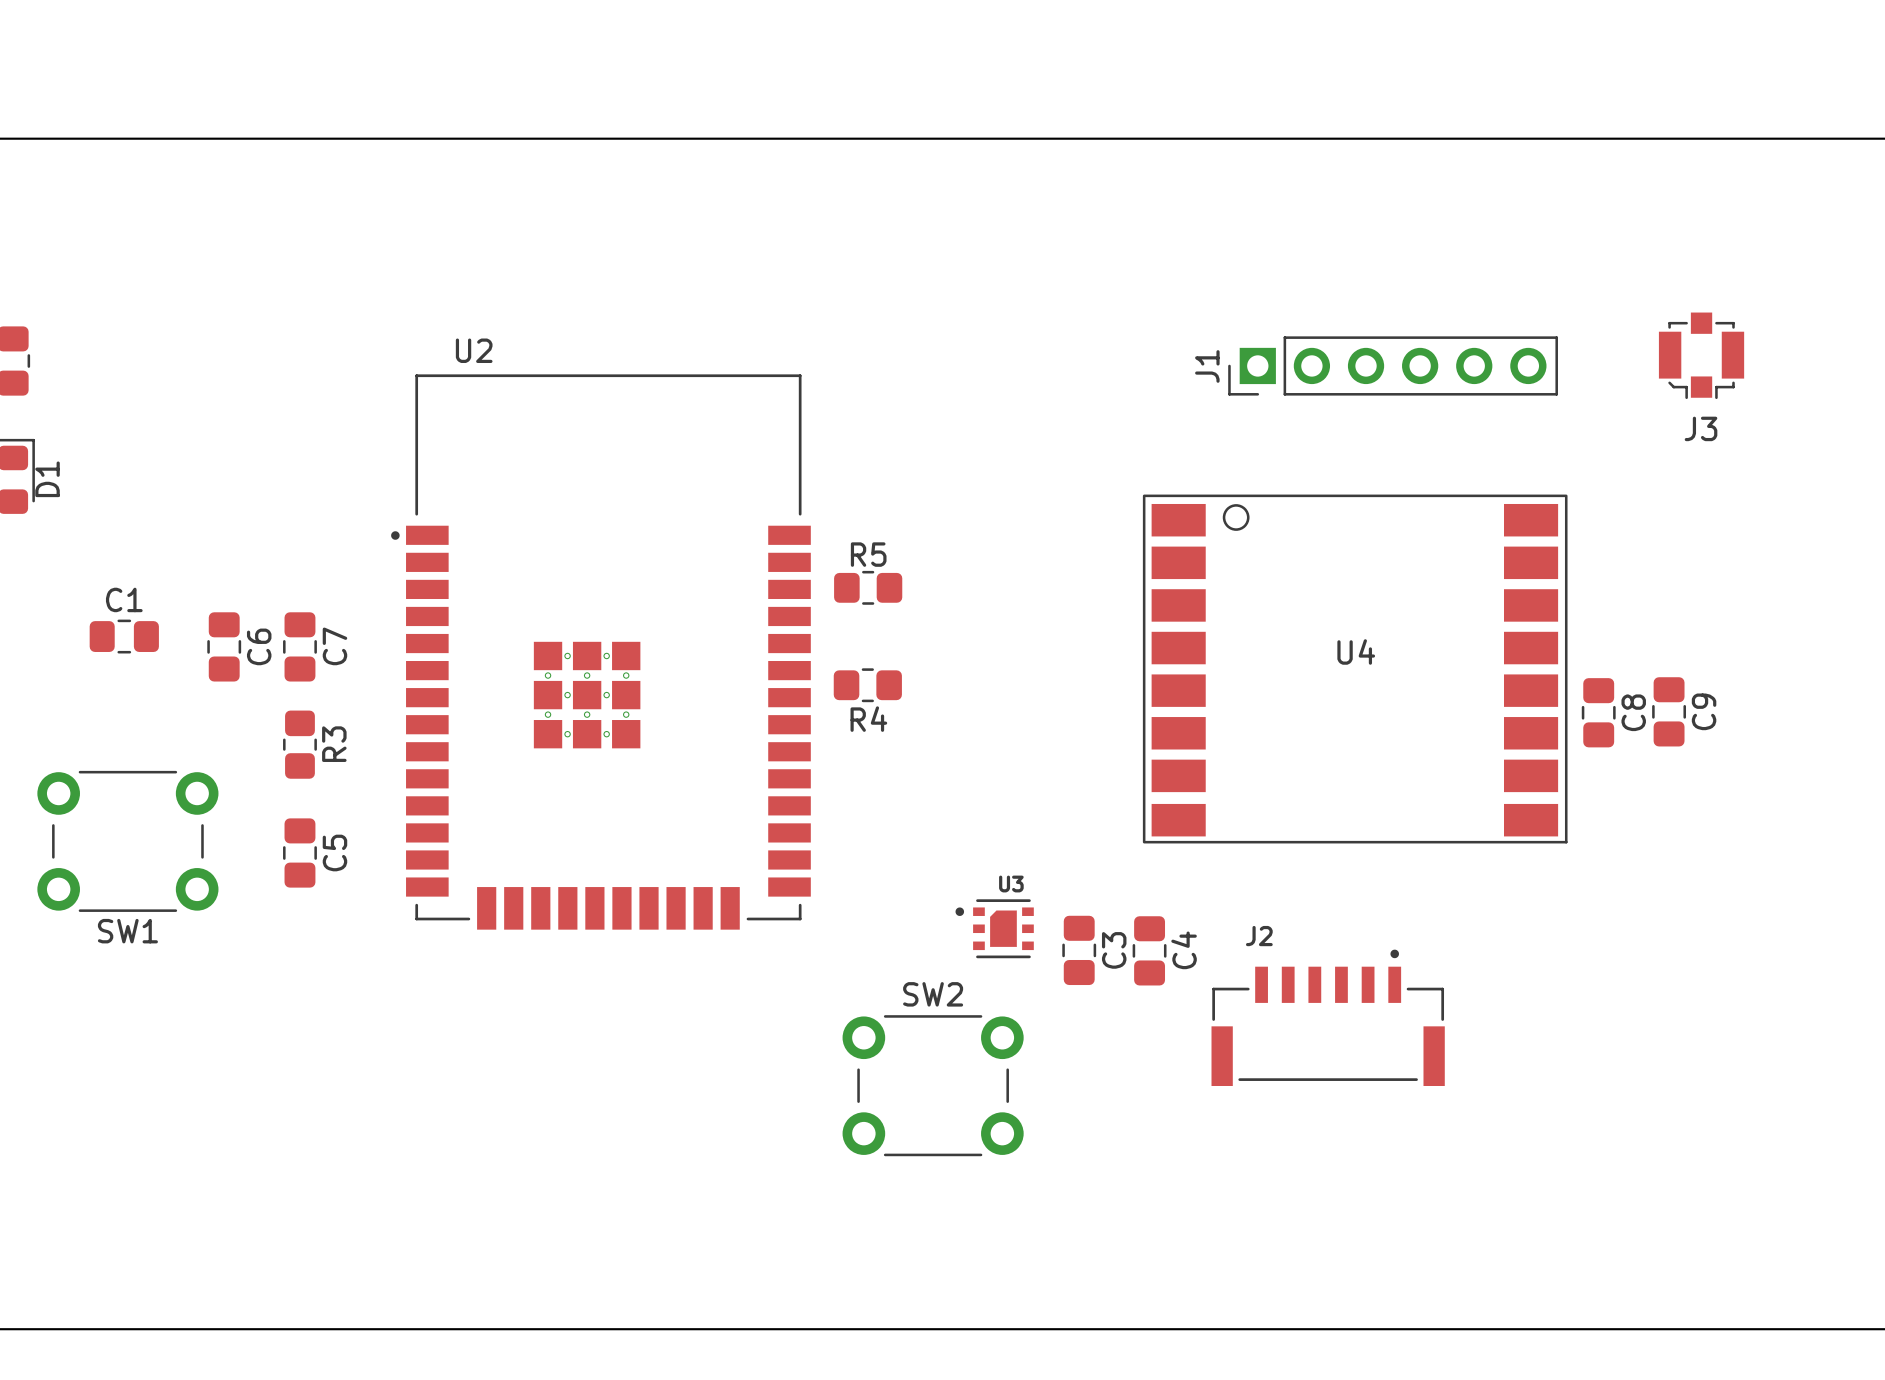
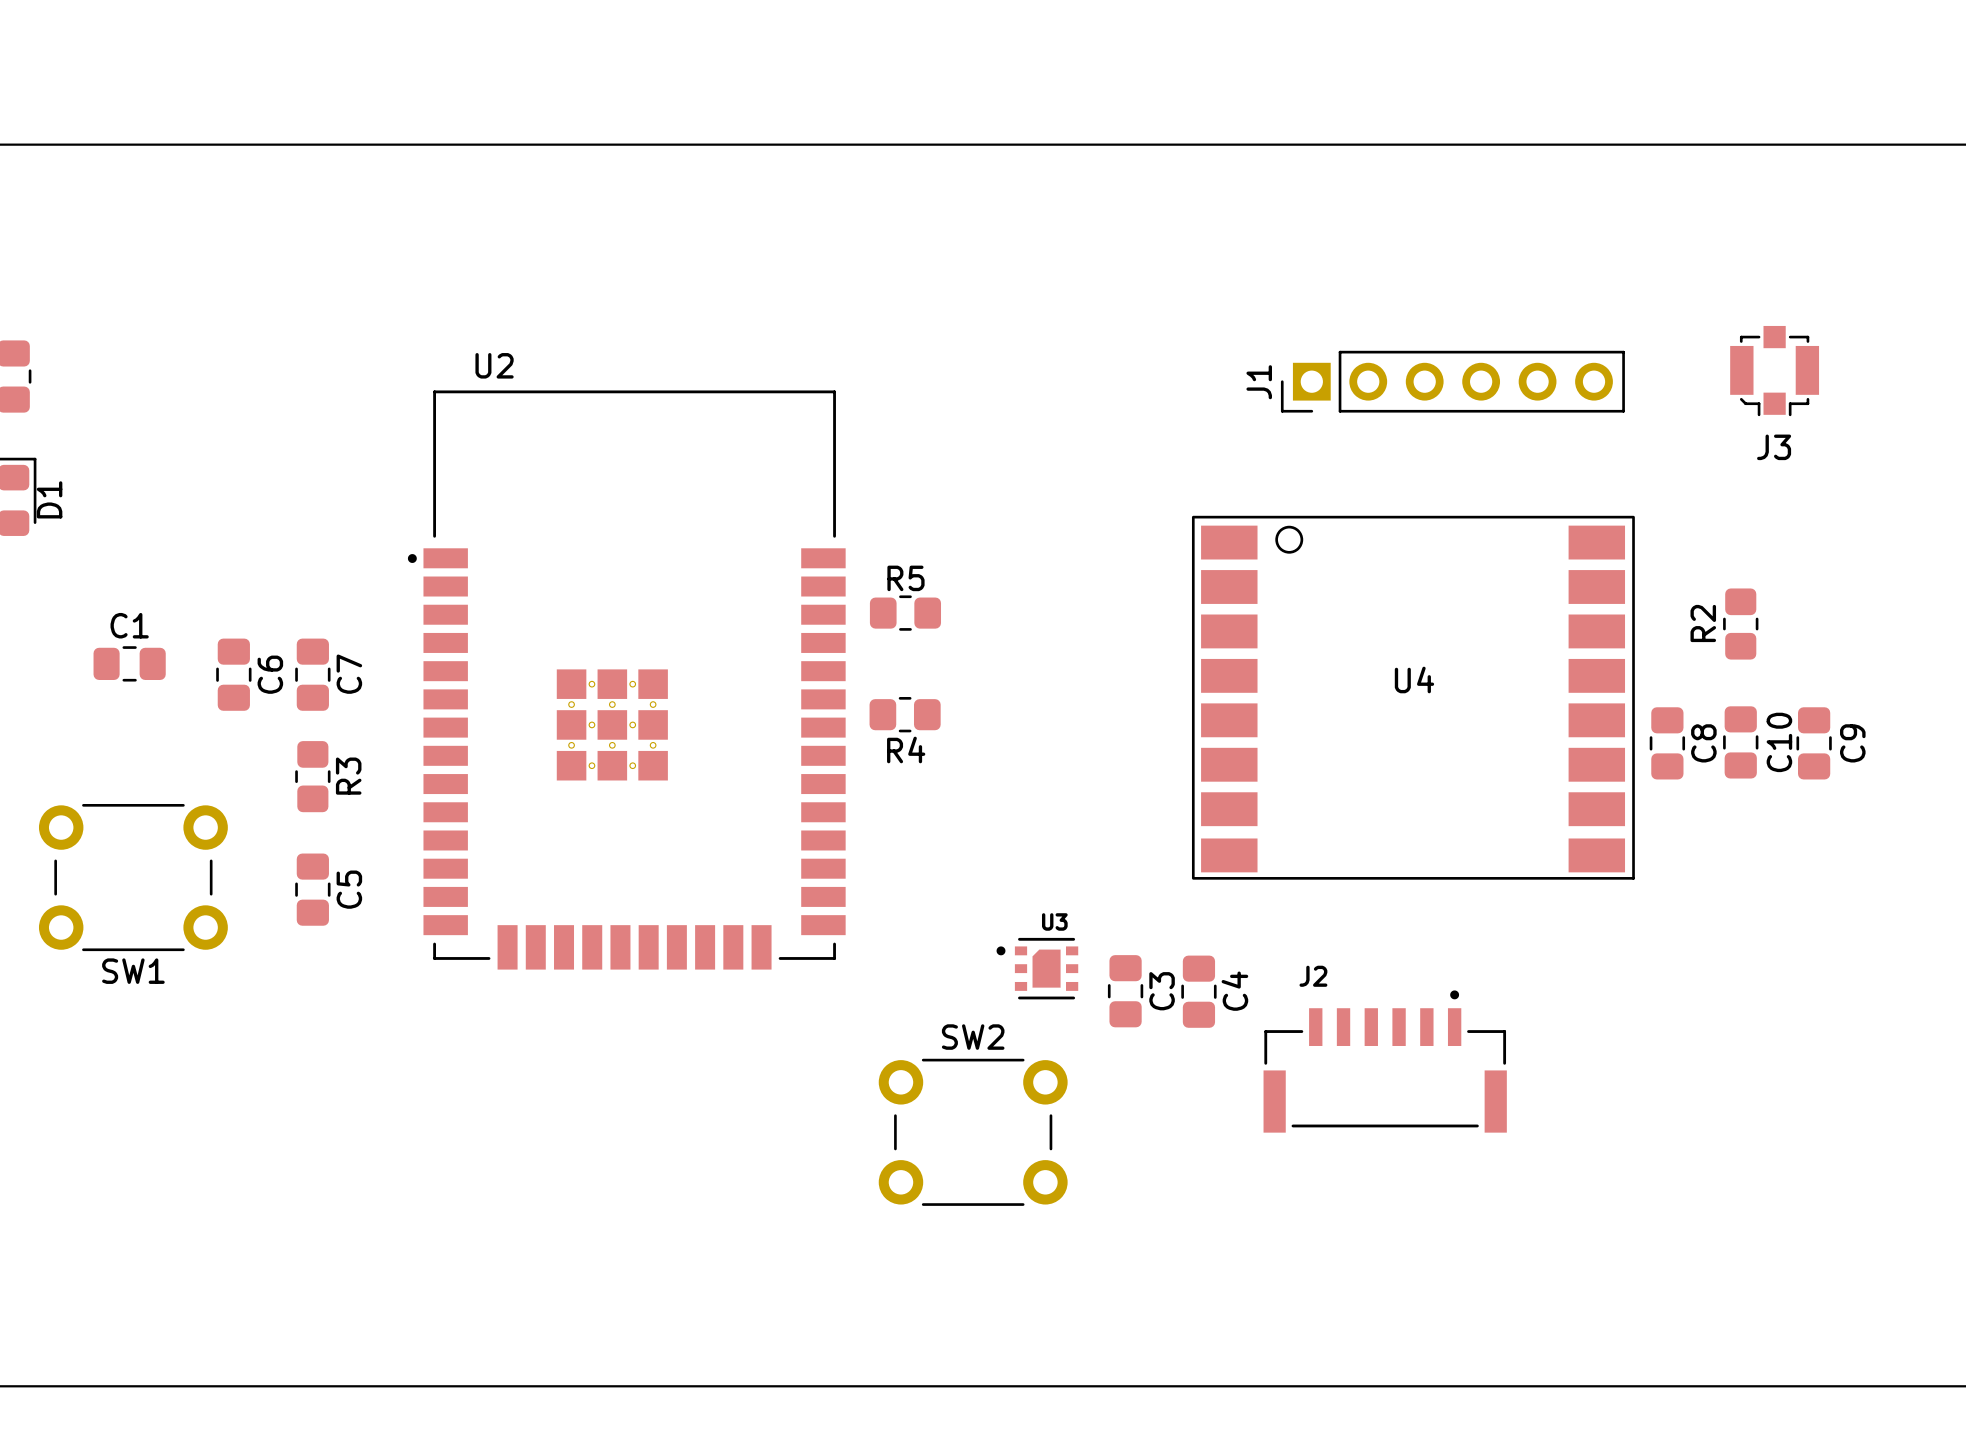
R2: none -> (1740, 624)
C9 name: C9 (1704, 711) -> C10 (1779, 742)
C9: none -> (1814, 743)

